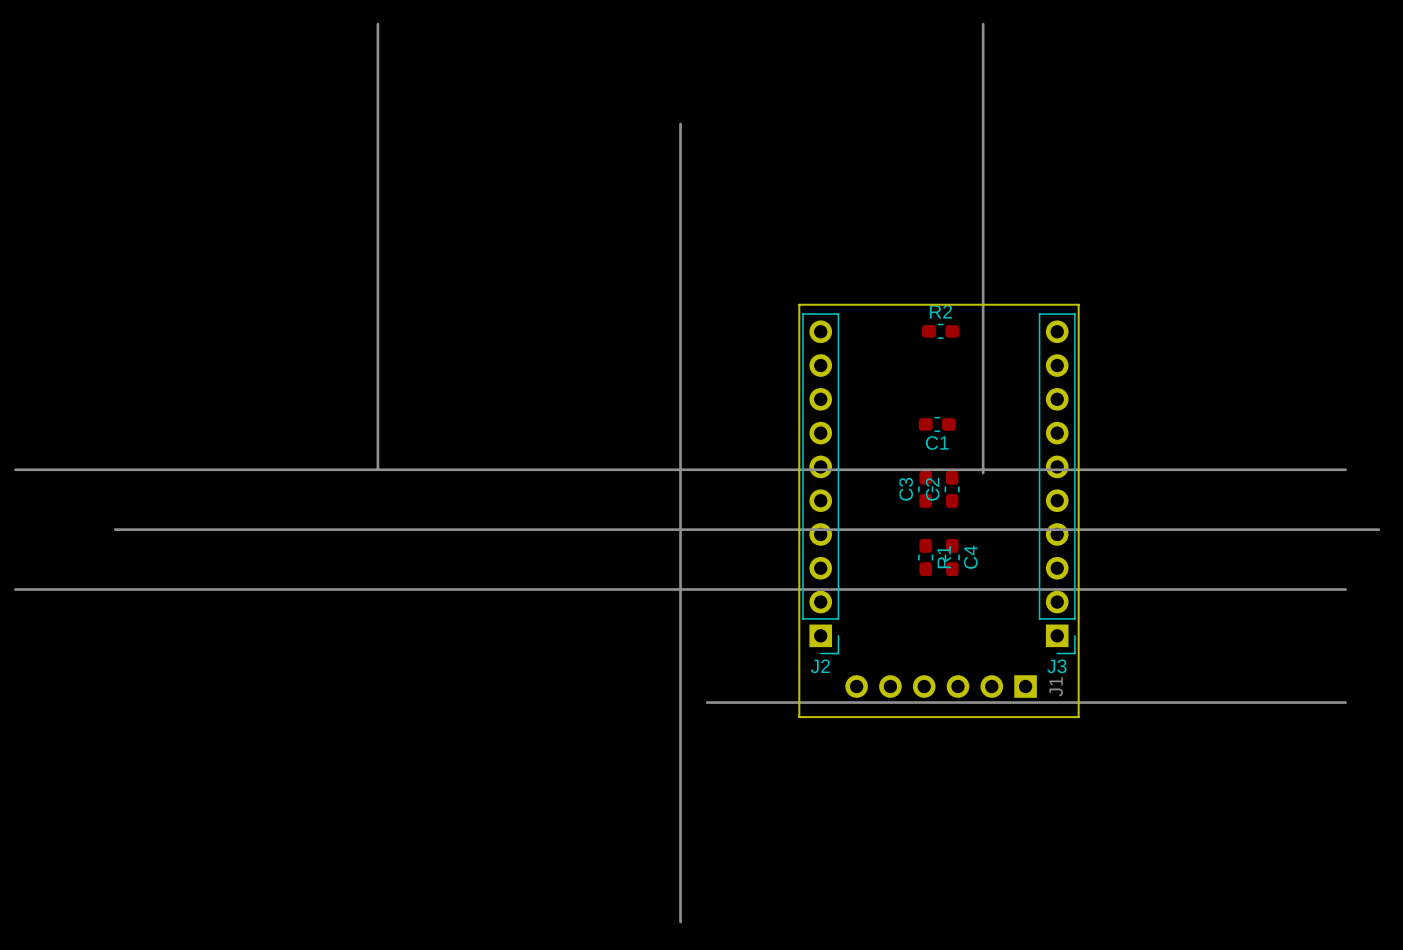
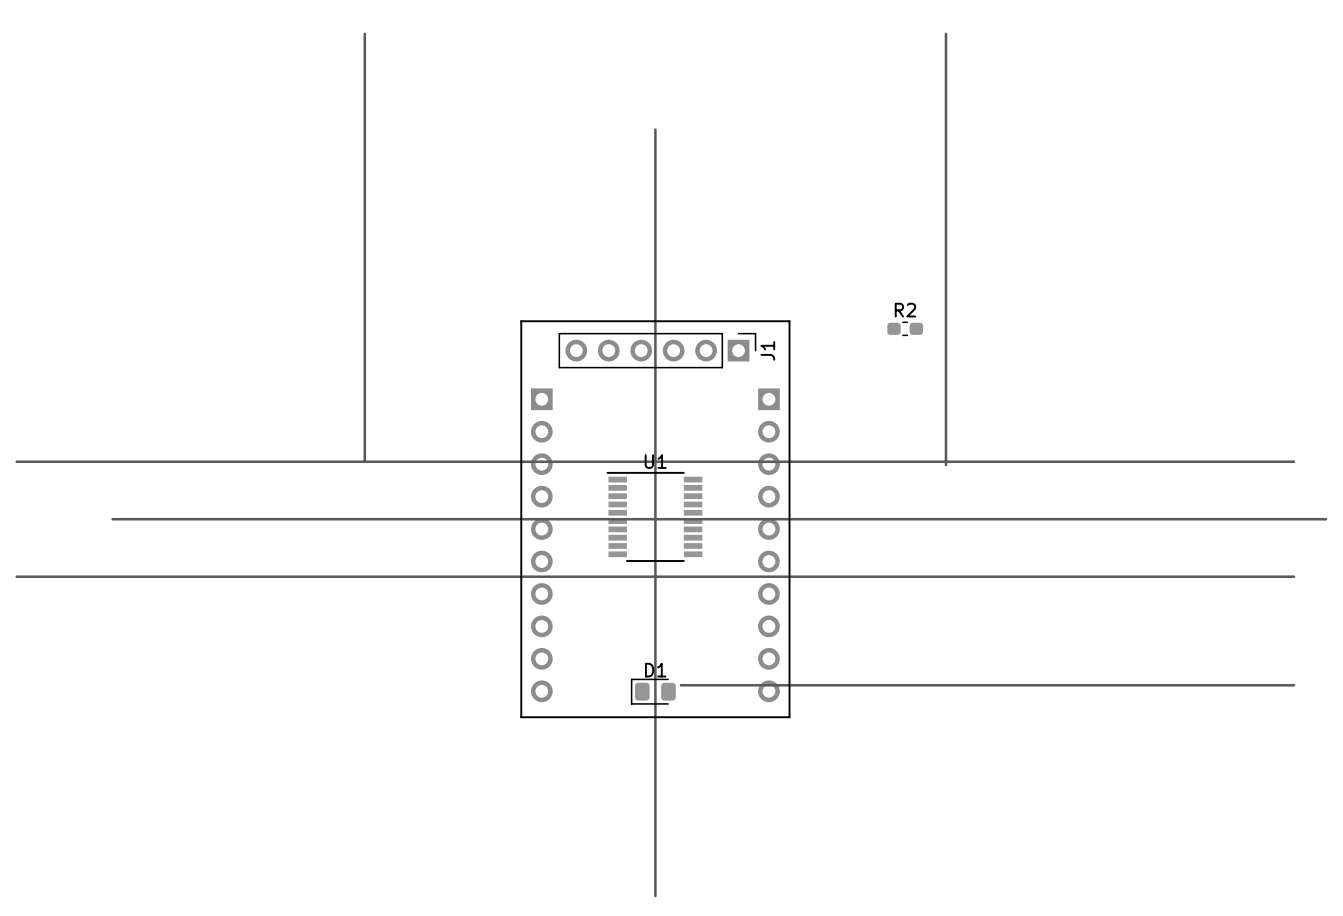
board edge: (799, 304) (1078, 304) (1078, 717) (799, 717) (799, 304) -> (521, 321) (789, 321) (789, 717) (521, 717) (521, 321)
C1: (937, 424) -> none
J2 side: top (820, 483) -> bottom (541, 545)
J3 side: top (1057, 483) -> bottom (768, 545)
C3: (925, 489) -> none
C2: (952, 489) -> none
U1: none -> (654, 516)
R1: (925, 557) -> none
C4: (952, 557) -> none
J1 side: bottom (941, 686) -> top (657, 350)
D1: none -> (653, 691)

